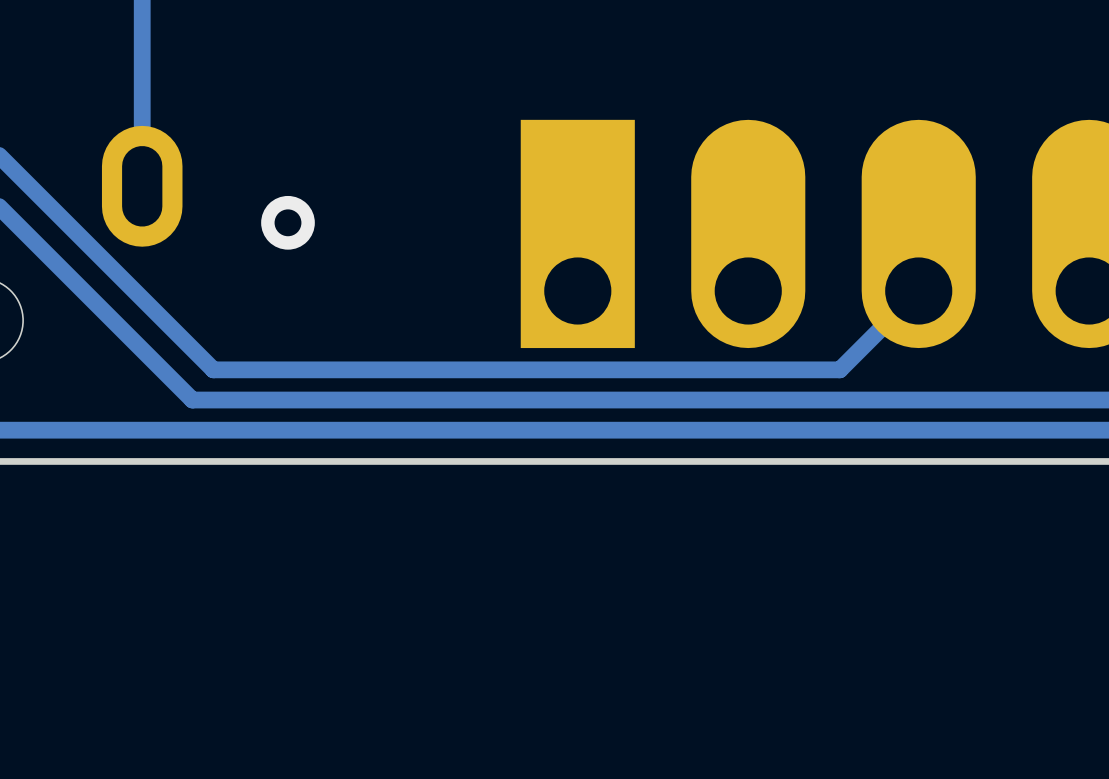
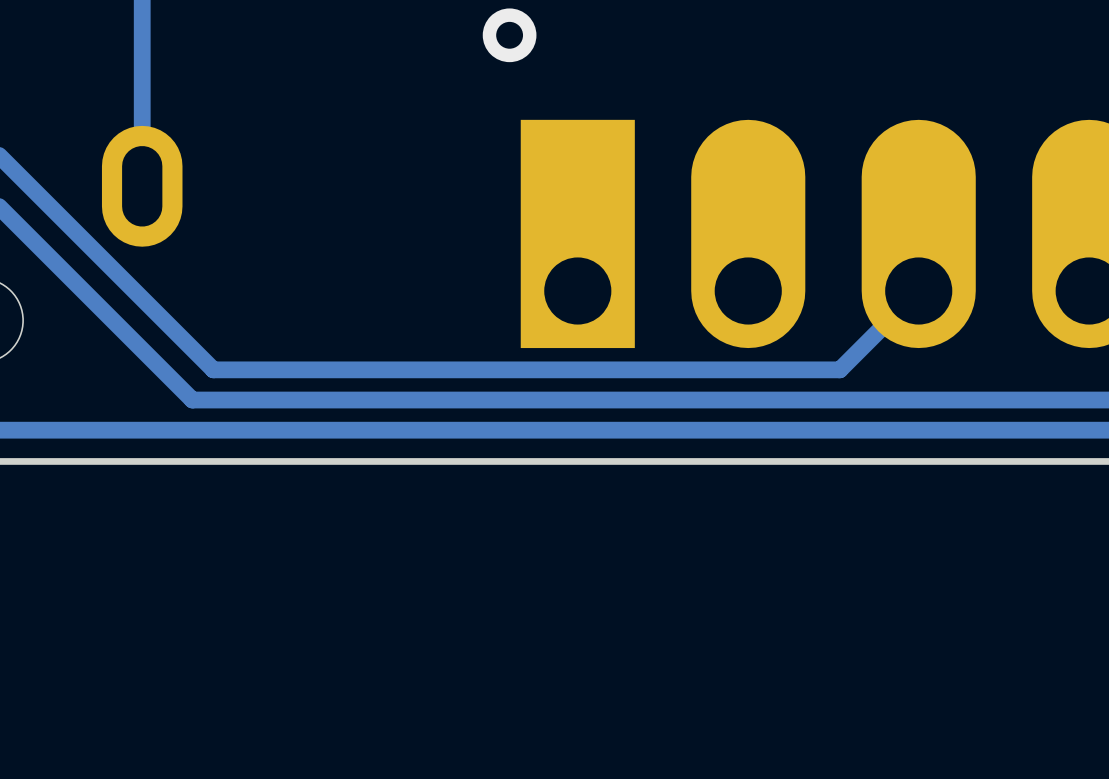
via position: (287, 222) -> (509, 35)

